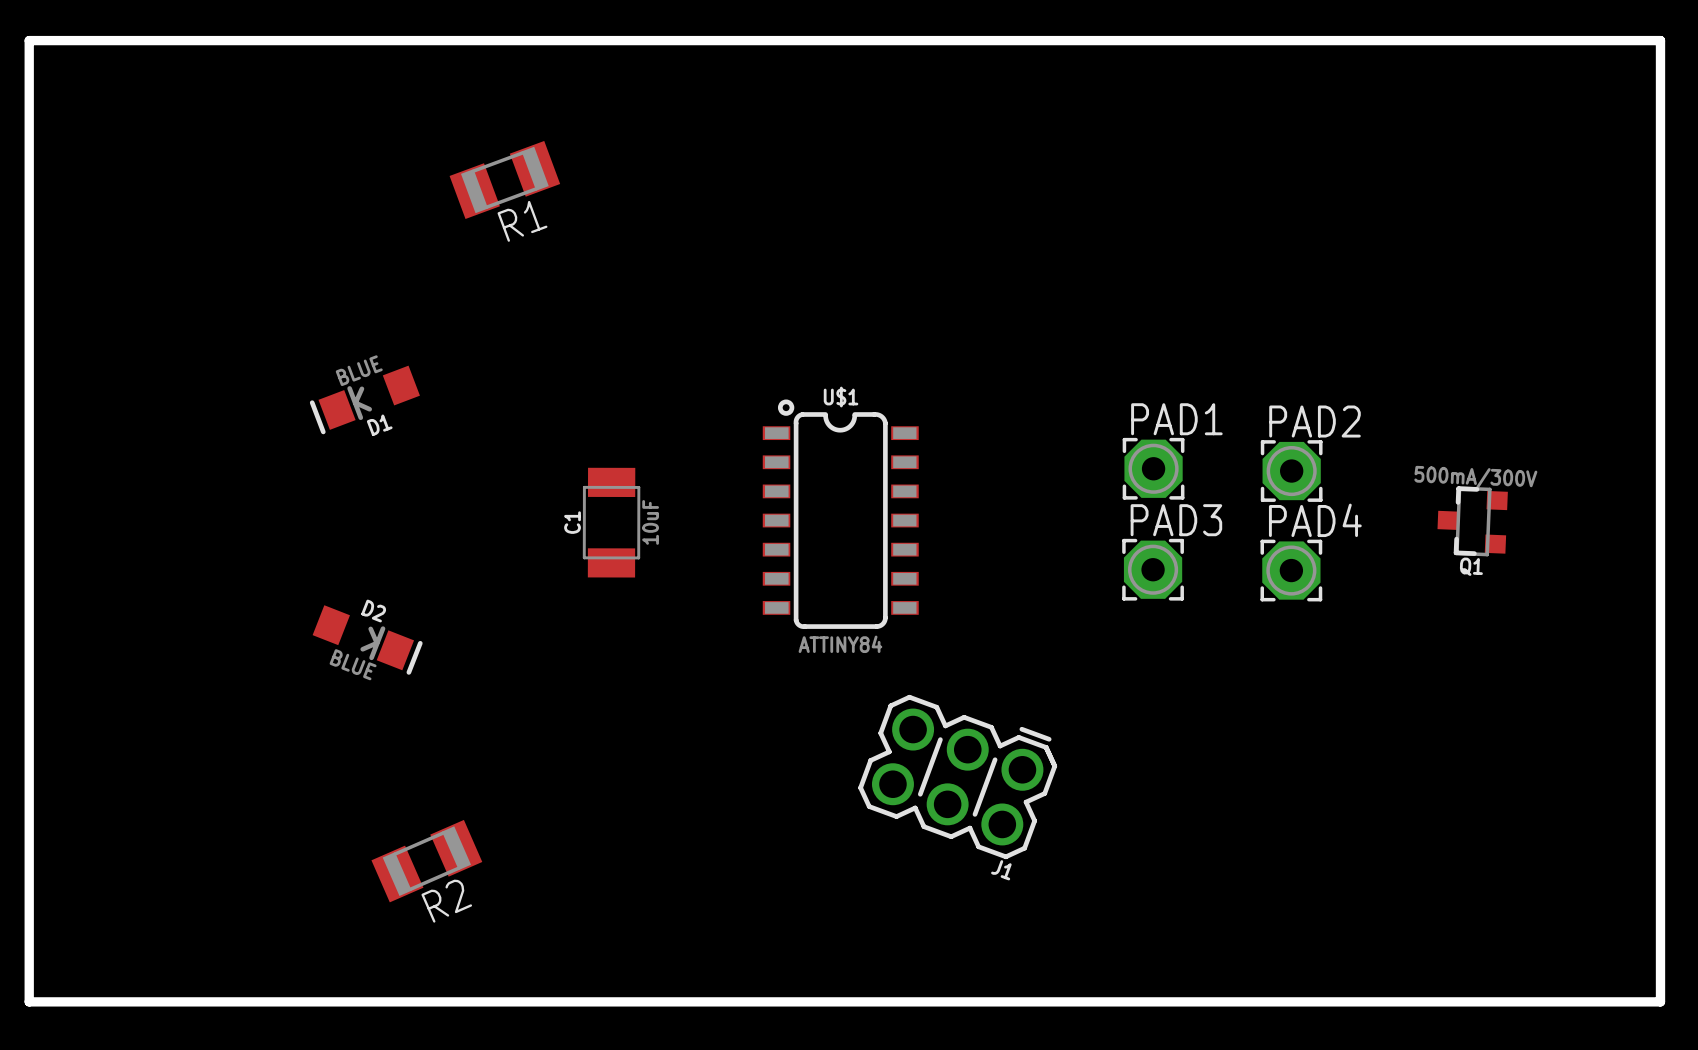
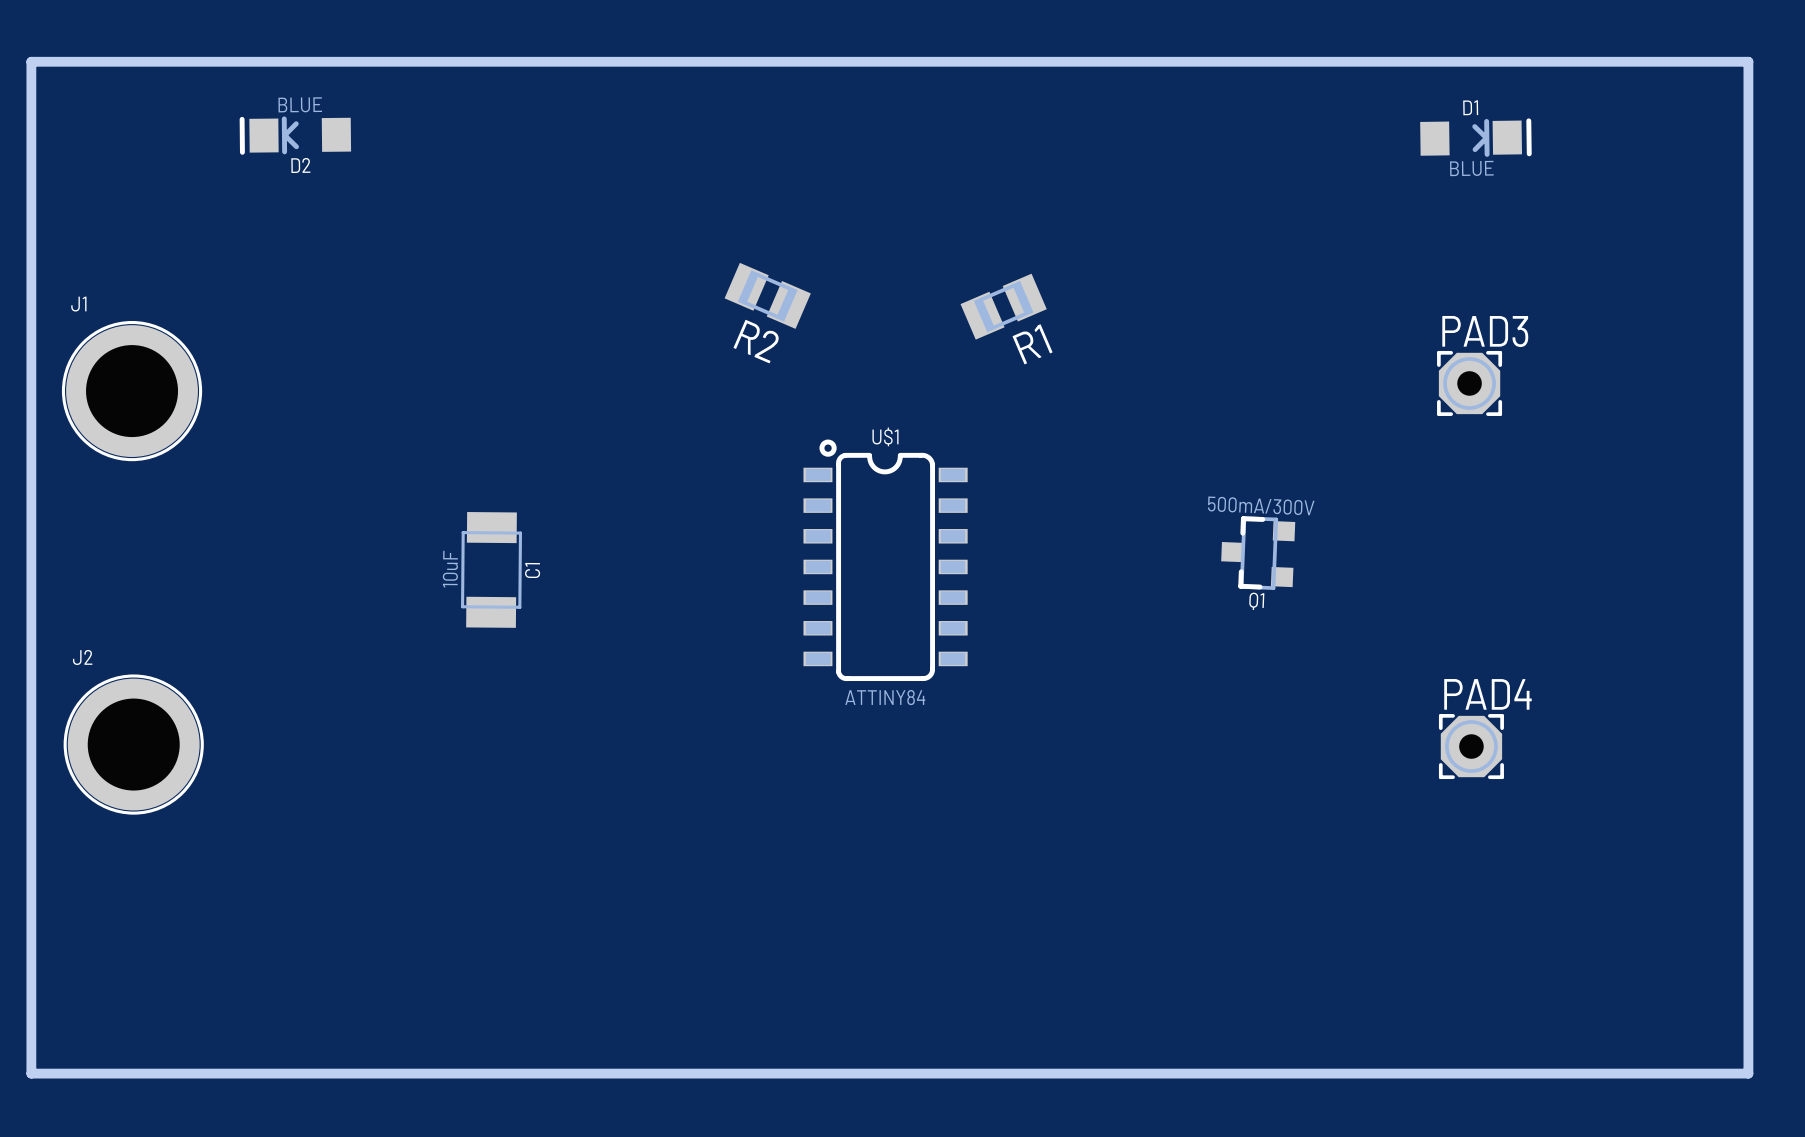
R1 footprint: [449, 140, 561, 219] -> [960, 273, 1047, 340]
D1 rotation: 0° (364, 399) -> 160° counterclockwise (1475, 137)
D1 position: (364, 399) -> (1475, 137)
PAD1: (1153, 468) -> none
PAD2: (1291, 471) -> none
Q1 position: (1472, 521) -> (1258, 553)
C1 name rotation: 0° (572, 522) -> 0.4° clockwise (532, 570)
C1 name position: C1 (572, 522) -> C1 (532, 570)
C1 position: (611, 522) -> (491, 569)
C1 value rotation: 0° (650, 522) -> 0.4° clockwise (450, 569)
C1 value position: 10uF (650, 522) -> 10uF (450, 569)
PAD3 position: (1153, 569) -> (1469, 383)
PAD4 position: (1291, 570) -> (1471, 746)
D2 rotation: 0° (367, 639) -> 158° clockwise (295, 135)
D2 position: (367, 639) -> (295, 135)
J2: none -> (133, 744)
J1 footprint: [858, 694, 1058, 860] -> [61, 320, 203, 462]
R2 footprint: [371, 819, 483, 903] -> [724, 262, 811, 329]
J1 name position: J1 (1001, 870) -> J1 (78, 304)

